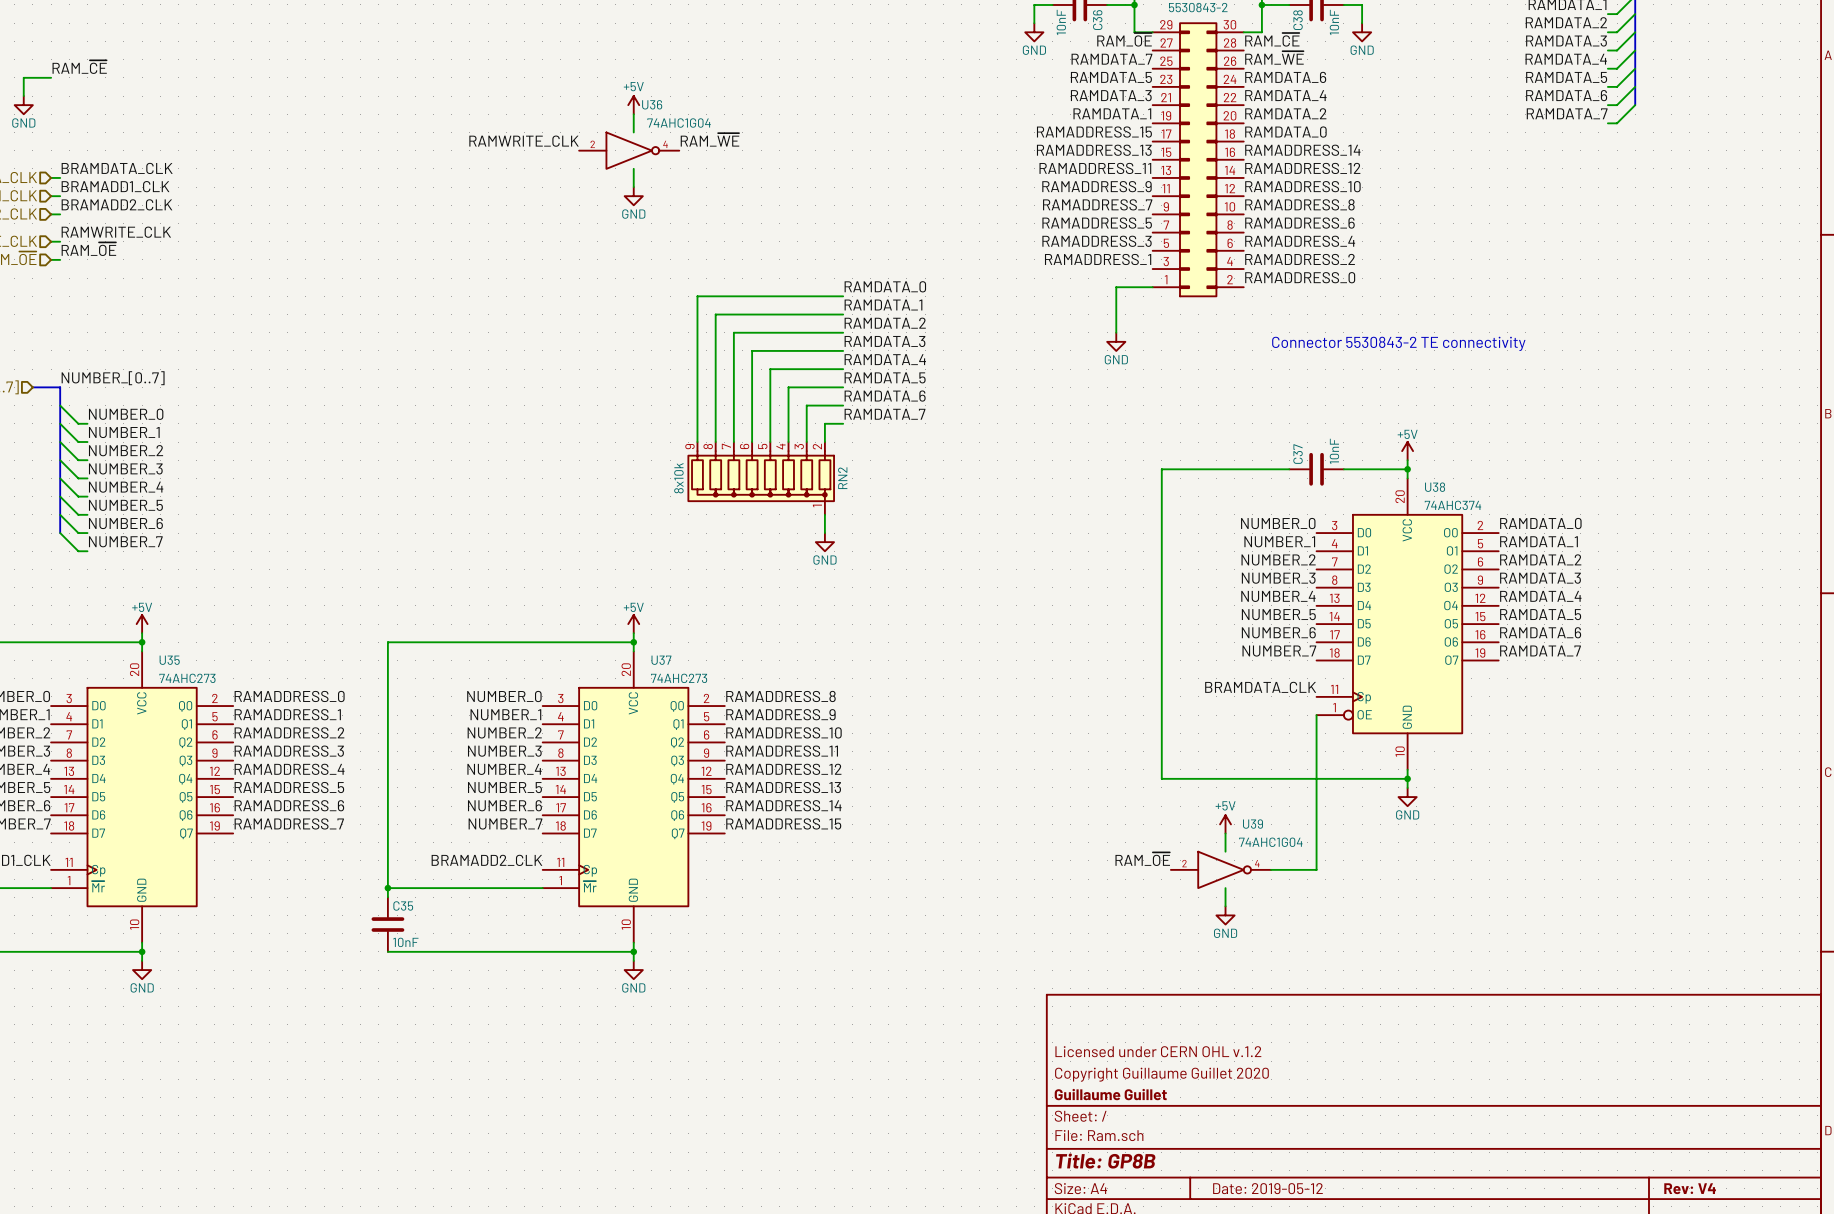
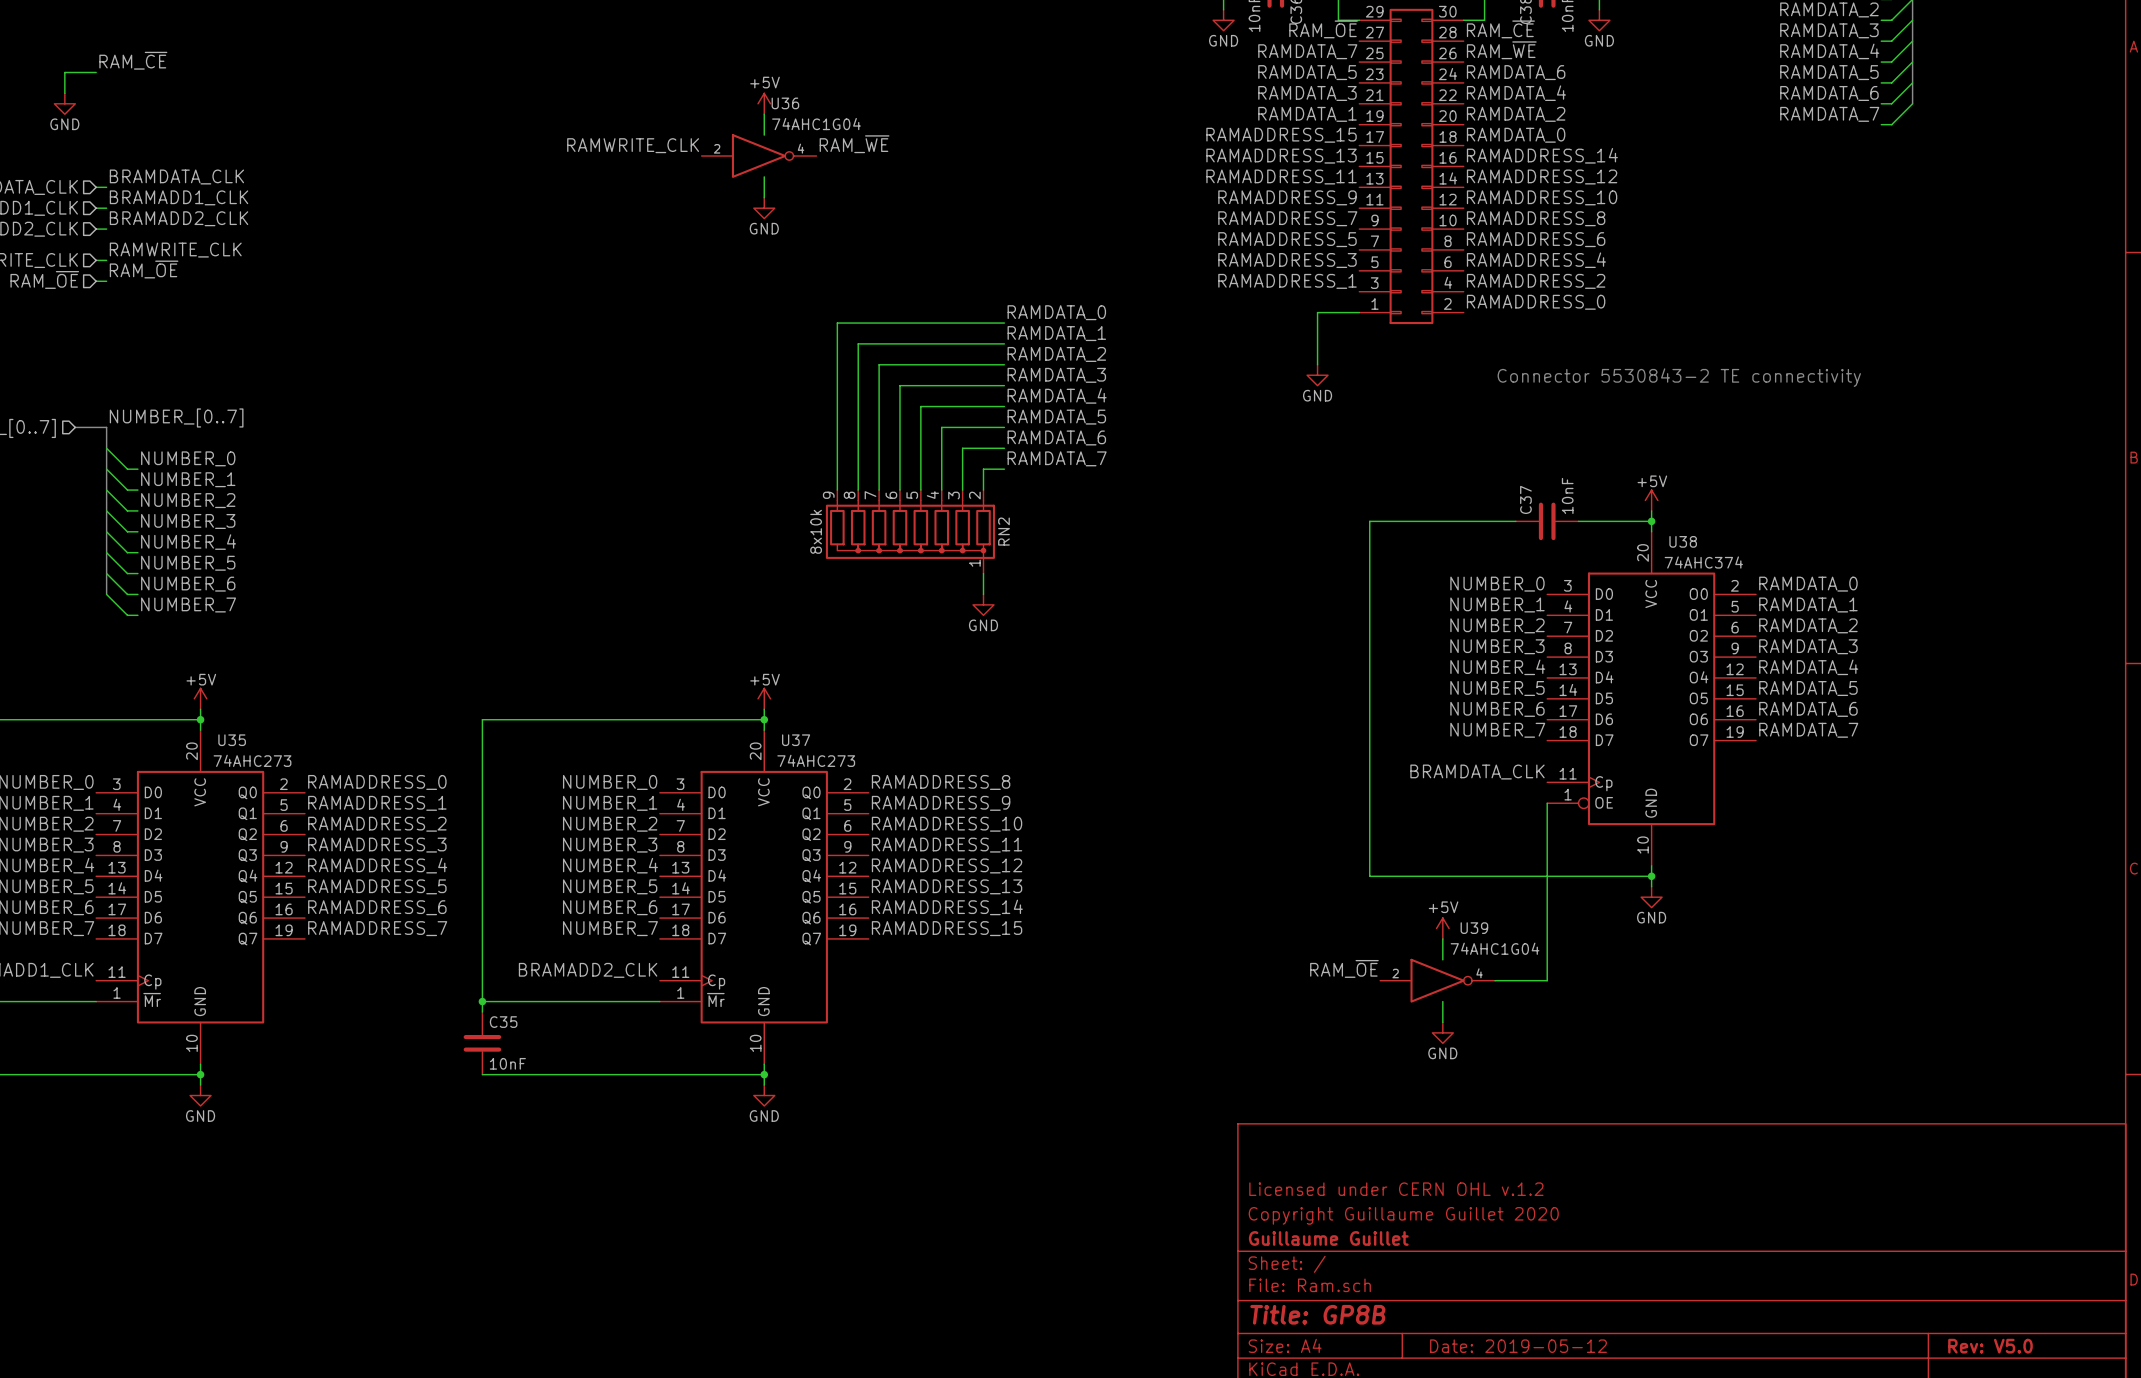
title block: Rev: V4 (1690, 1188) -> Rev: V5.0 (1990, 1346)

